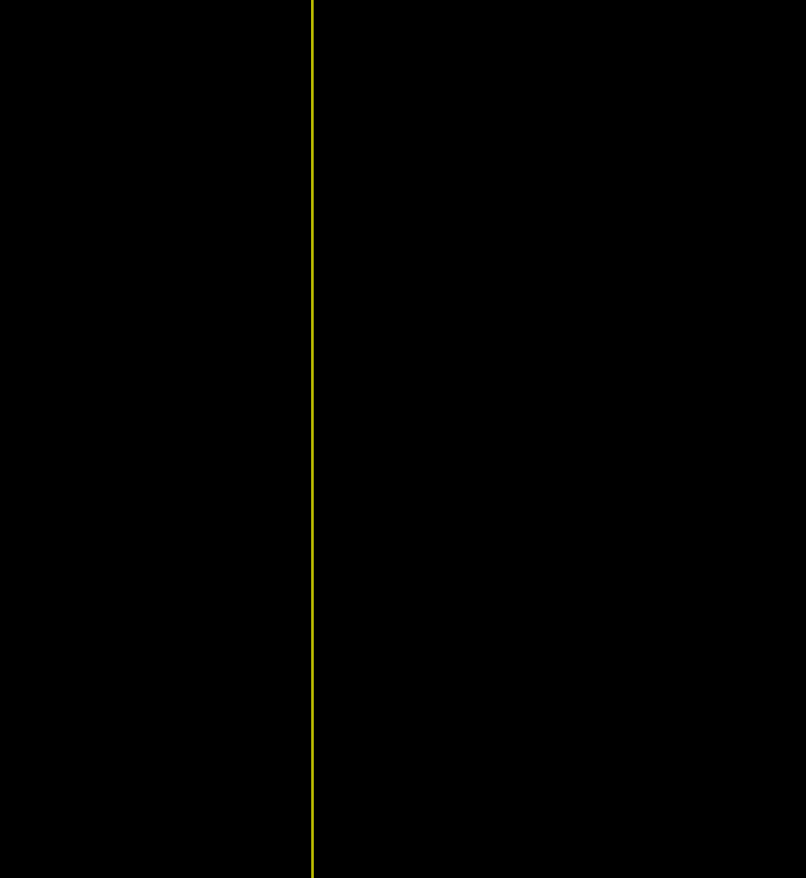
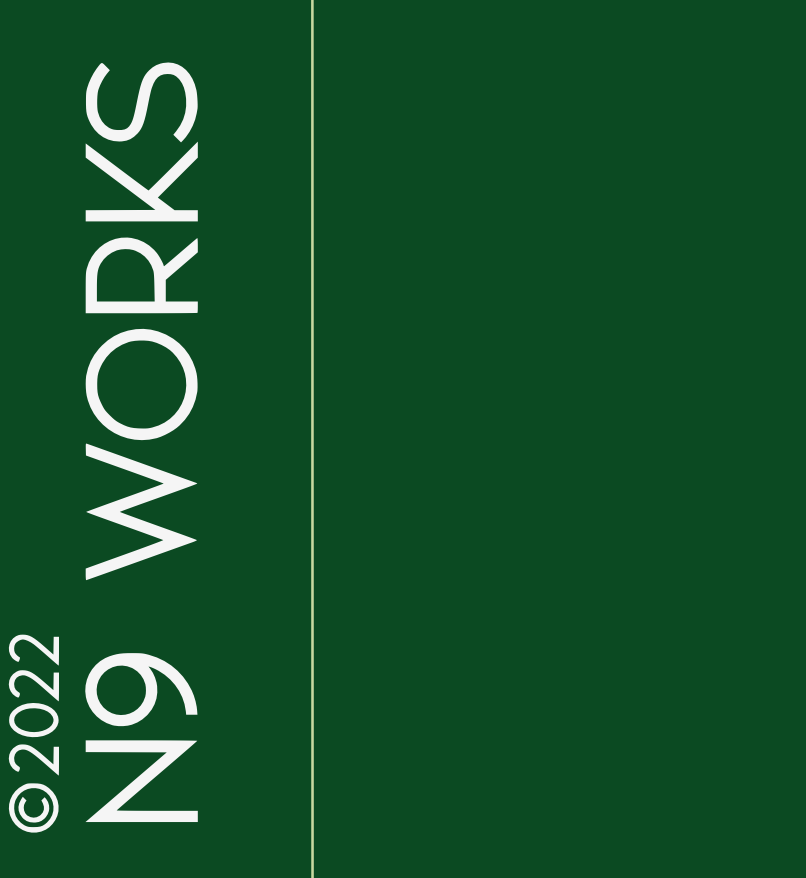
drawing: none -> [8, 62, 198, 833]

